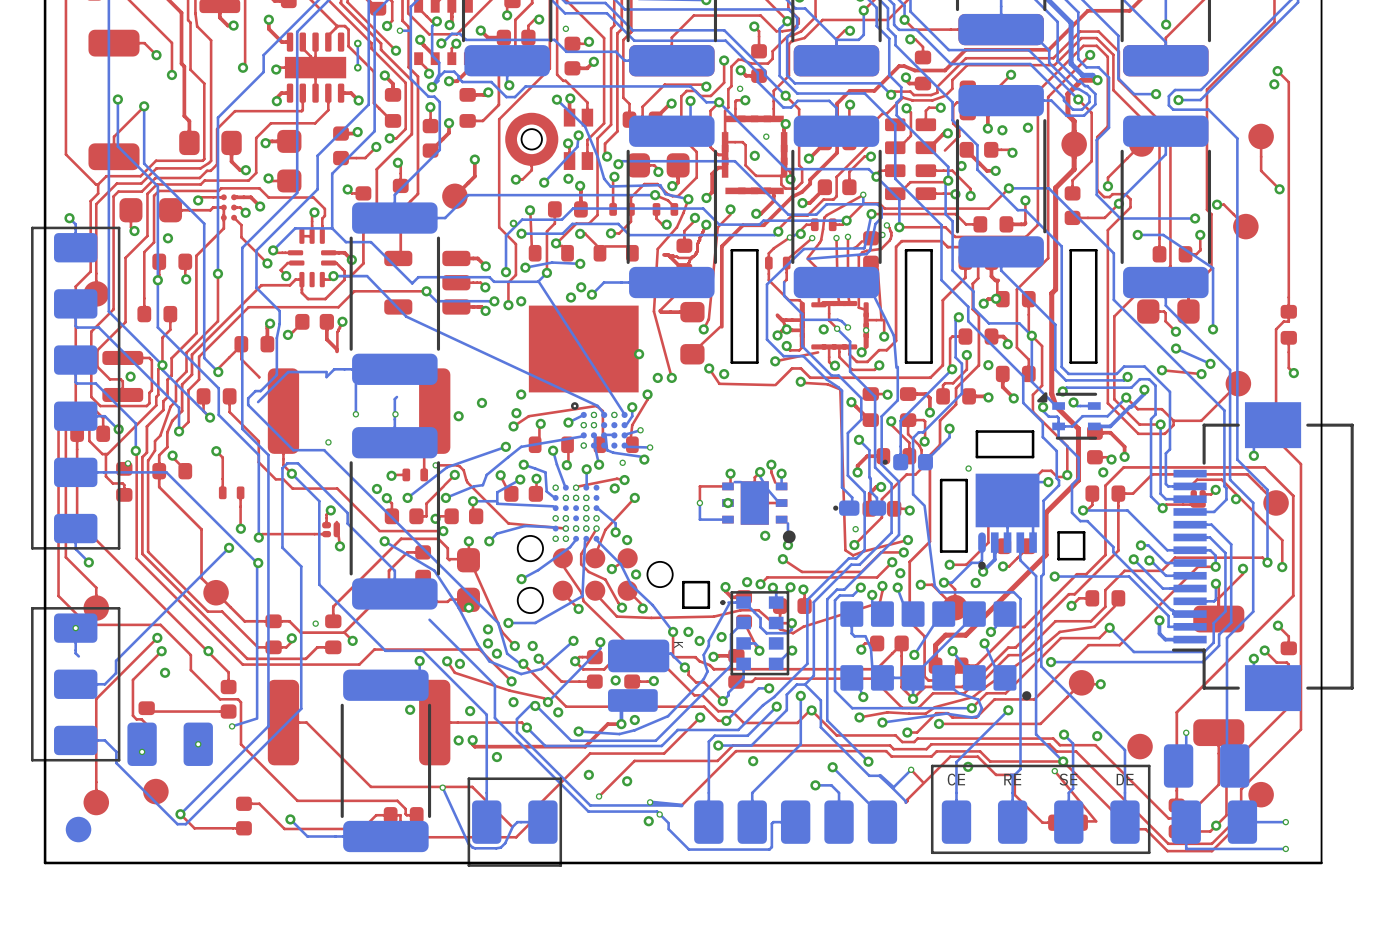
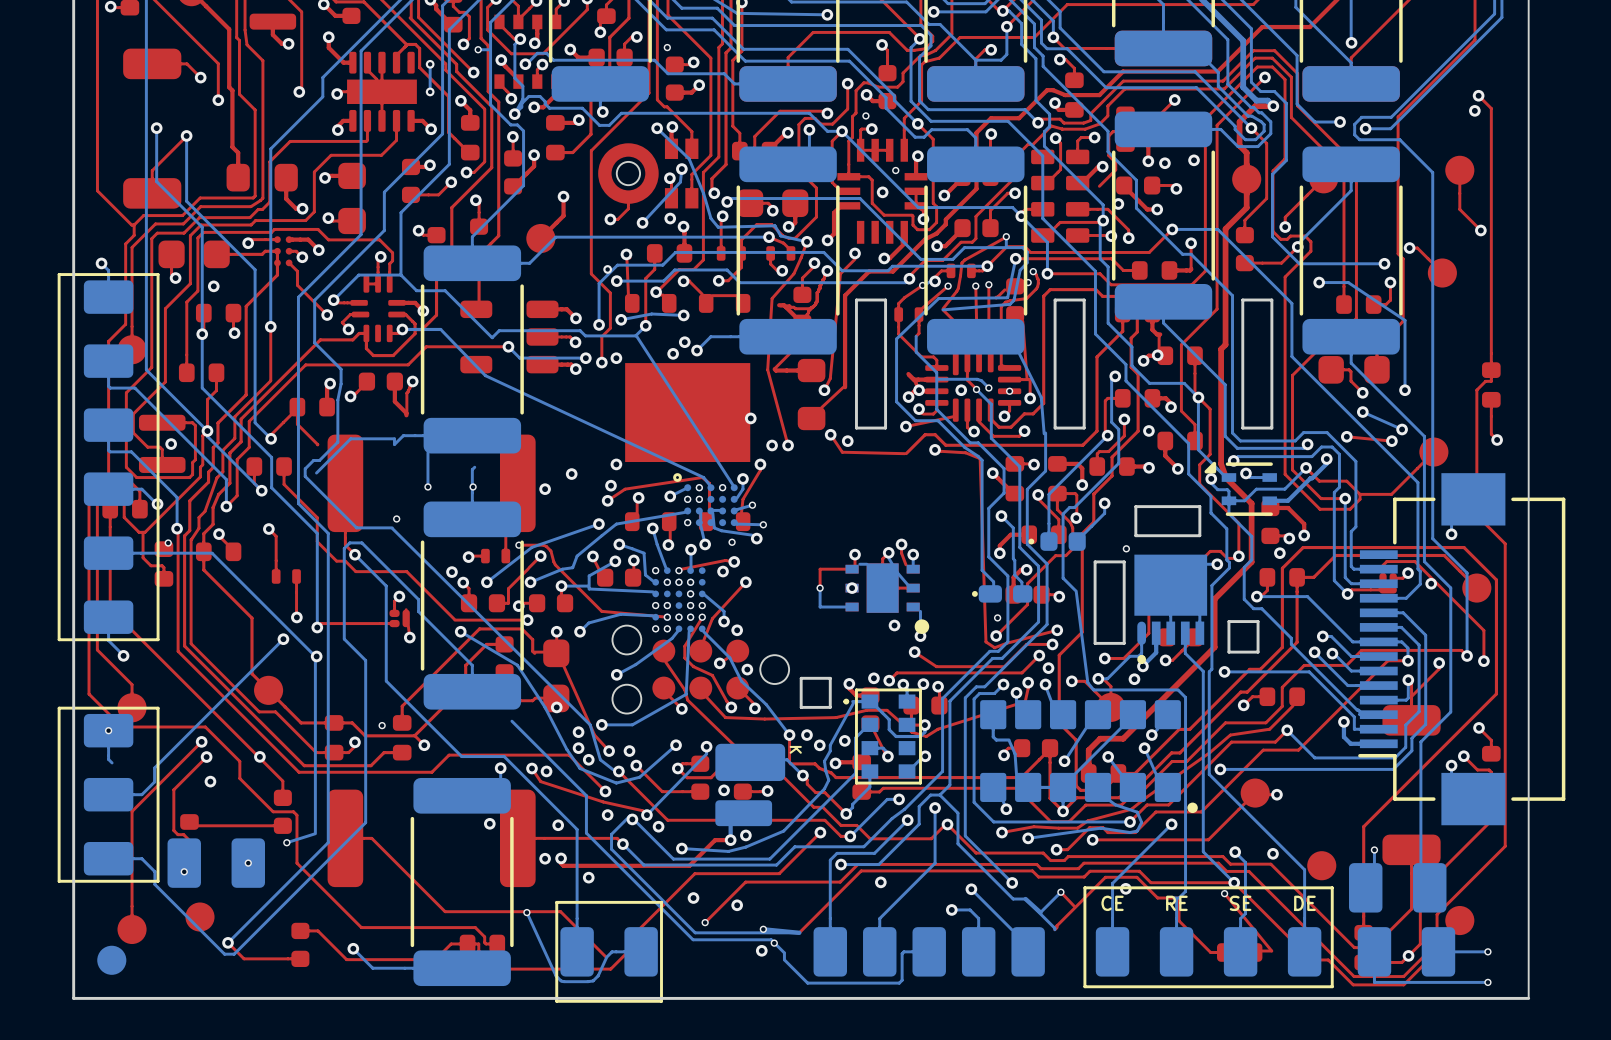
part footprint: [721, 115, 788, 195] -> [837, 138, 928, 244]
part footprint: [799, 300, 869, 350] -> [925, 349, 1022, 422]

